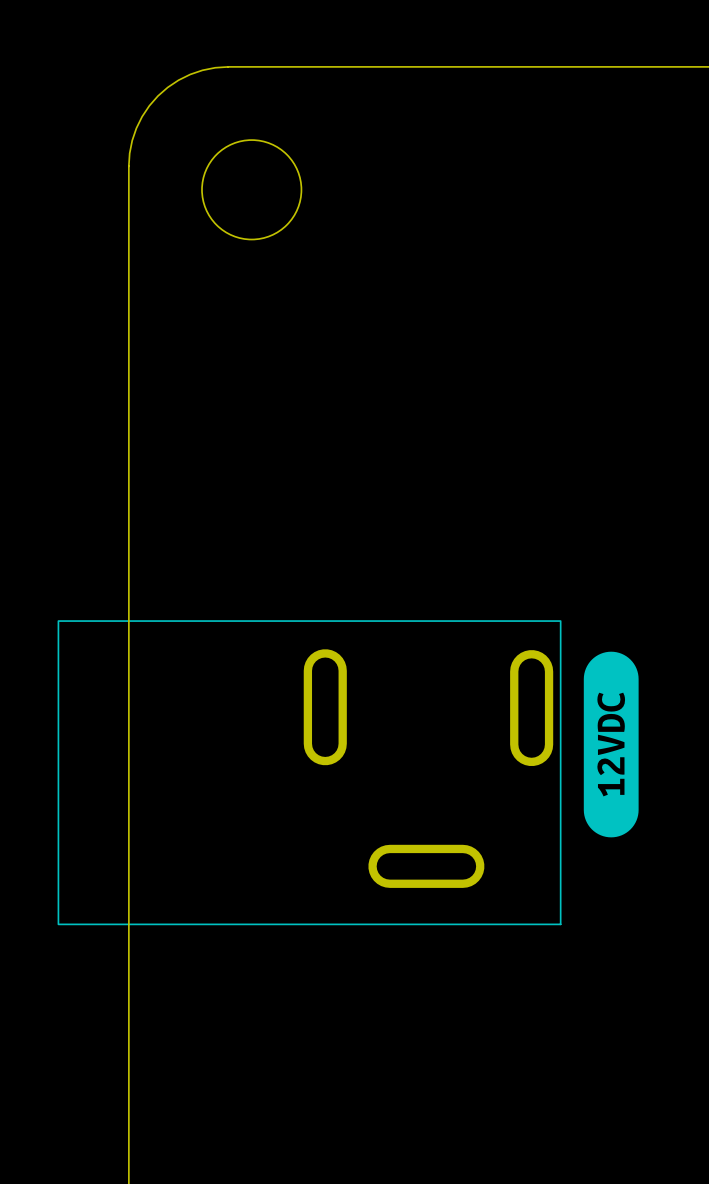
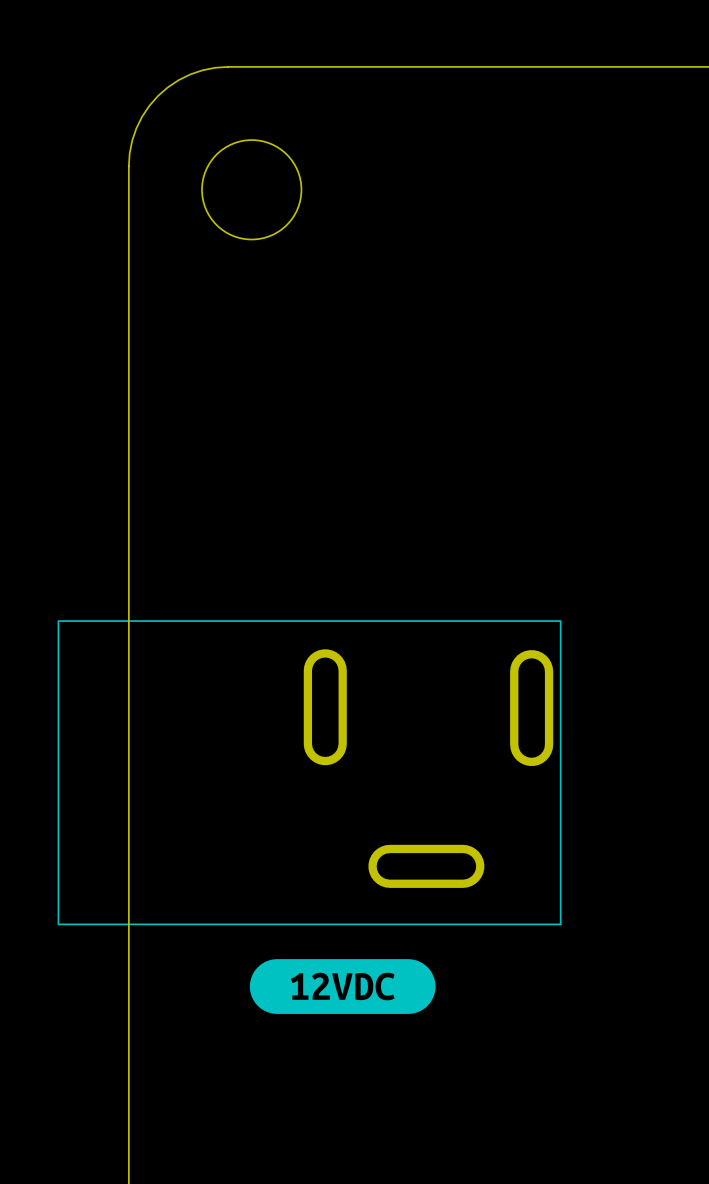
drawing: [583, 651, 639, 838] -> none
drawing: none -> [249, 959, 436, 1014]

